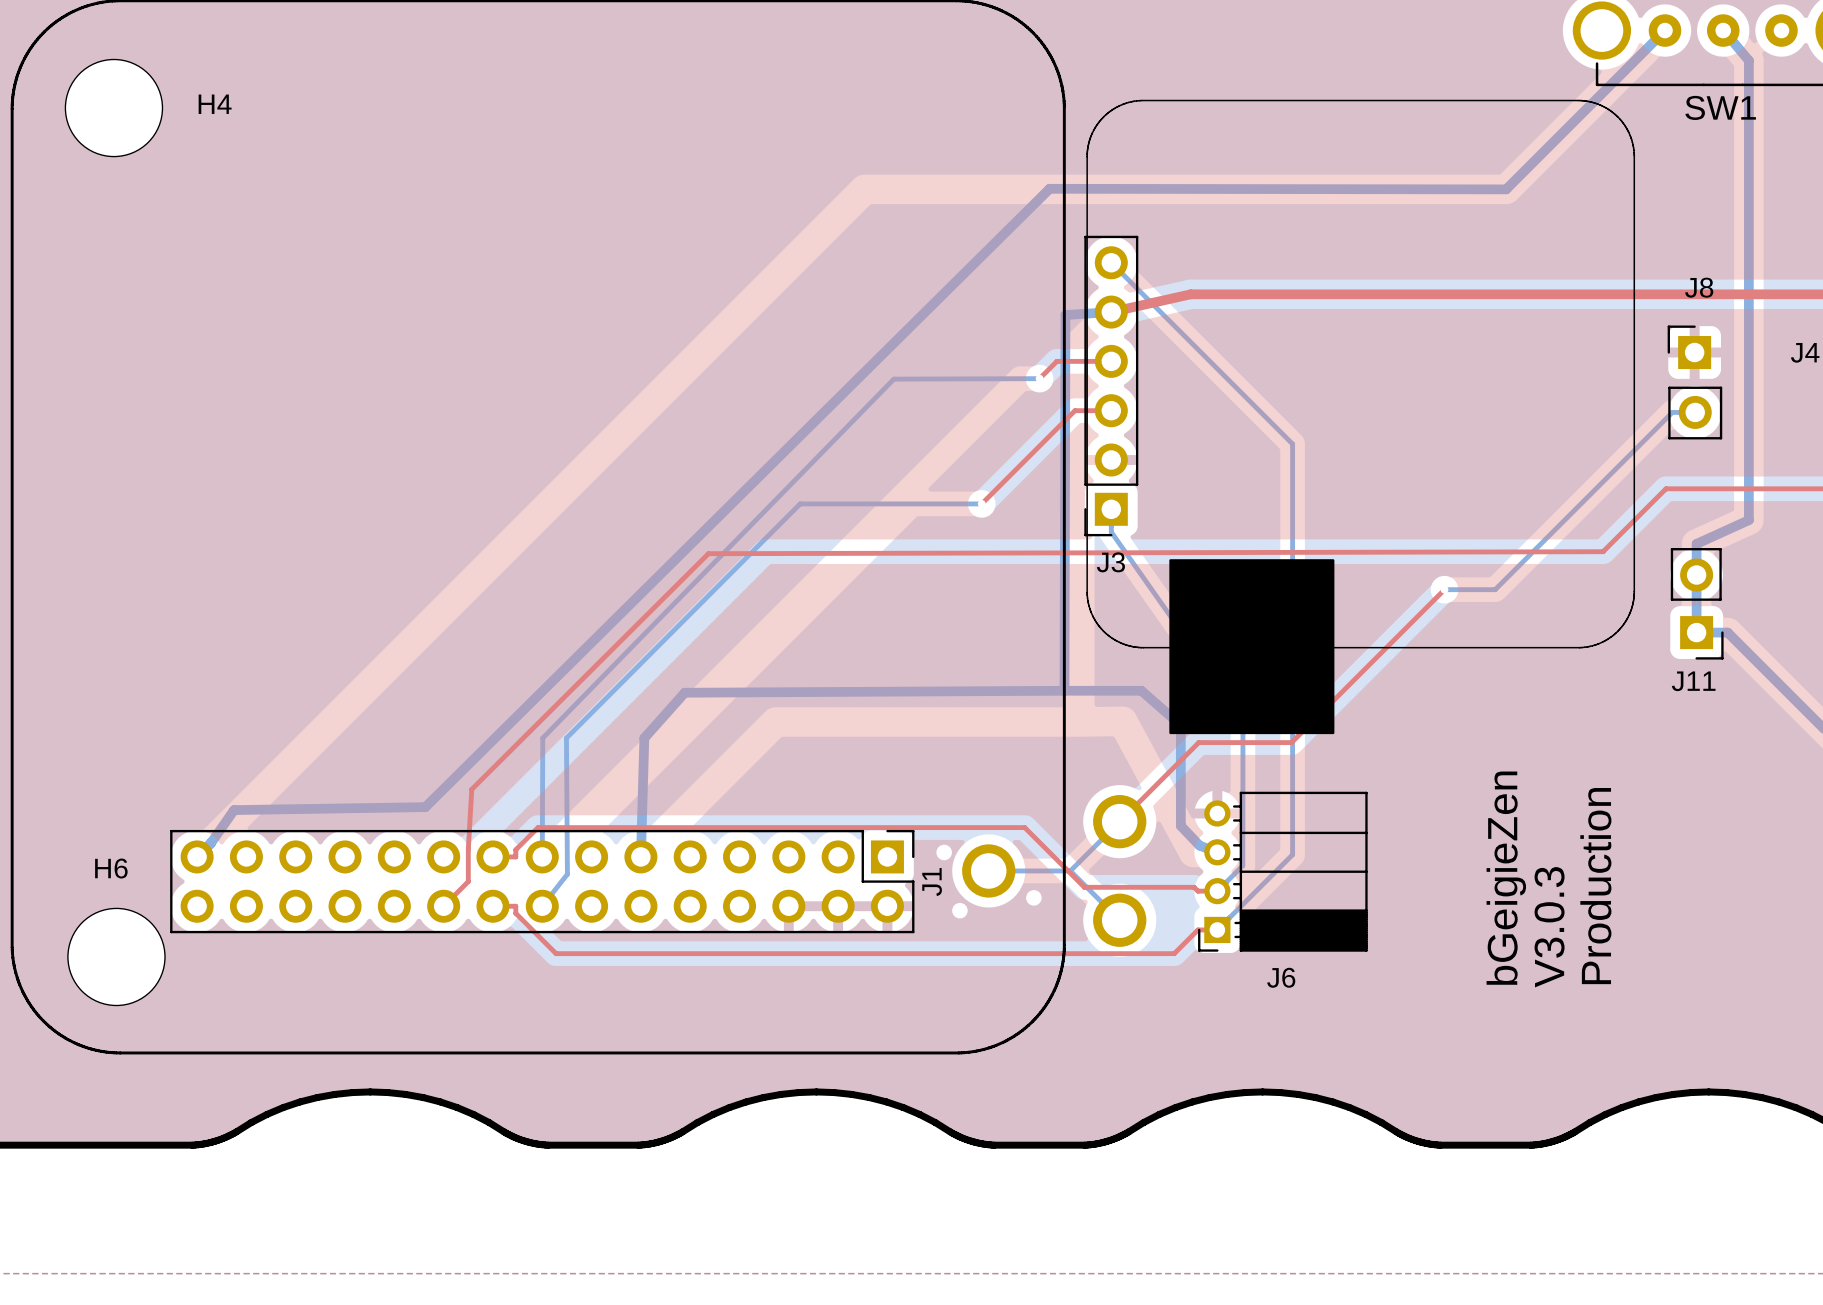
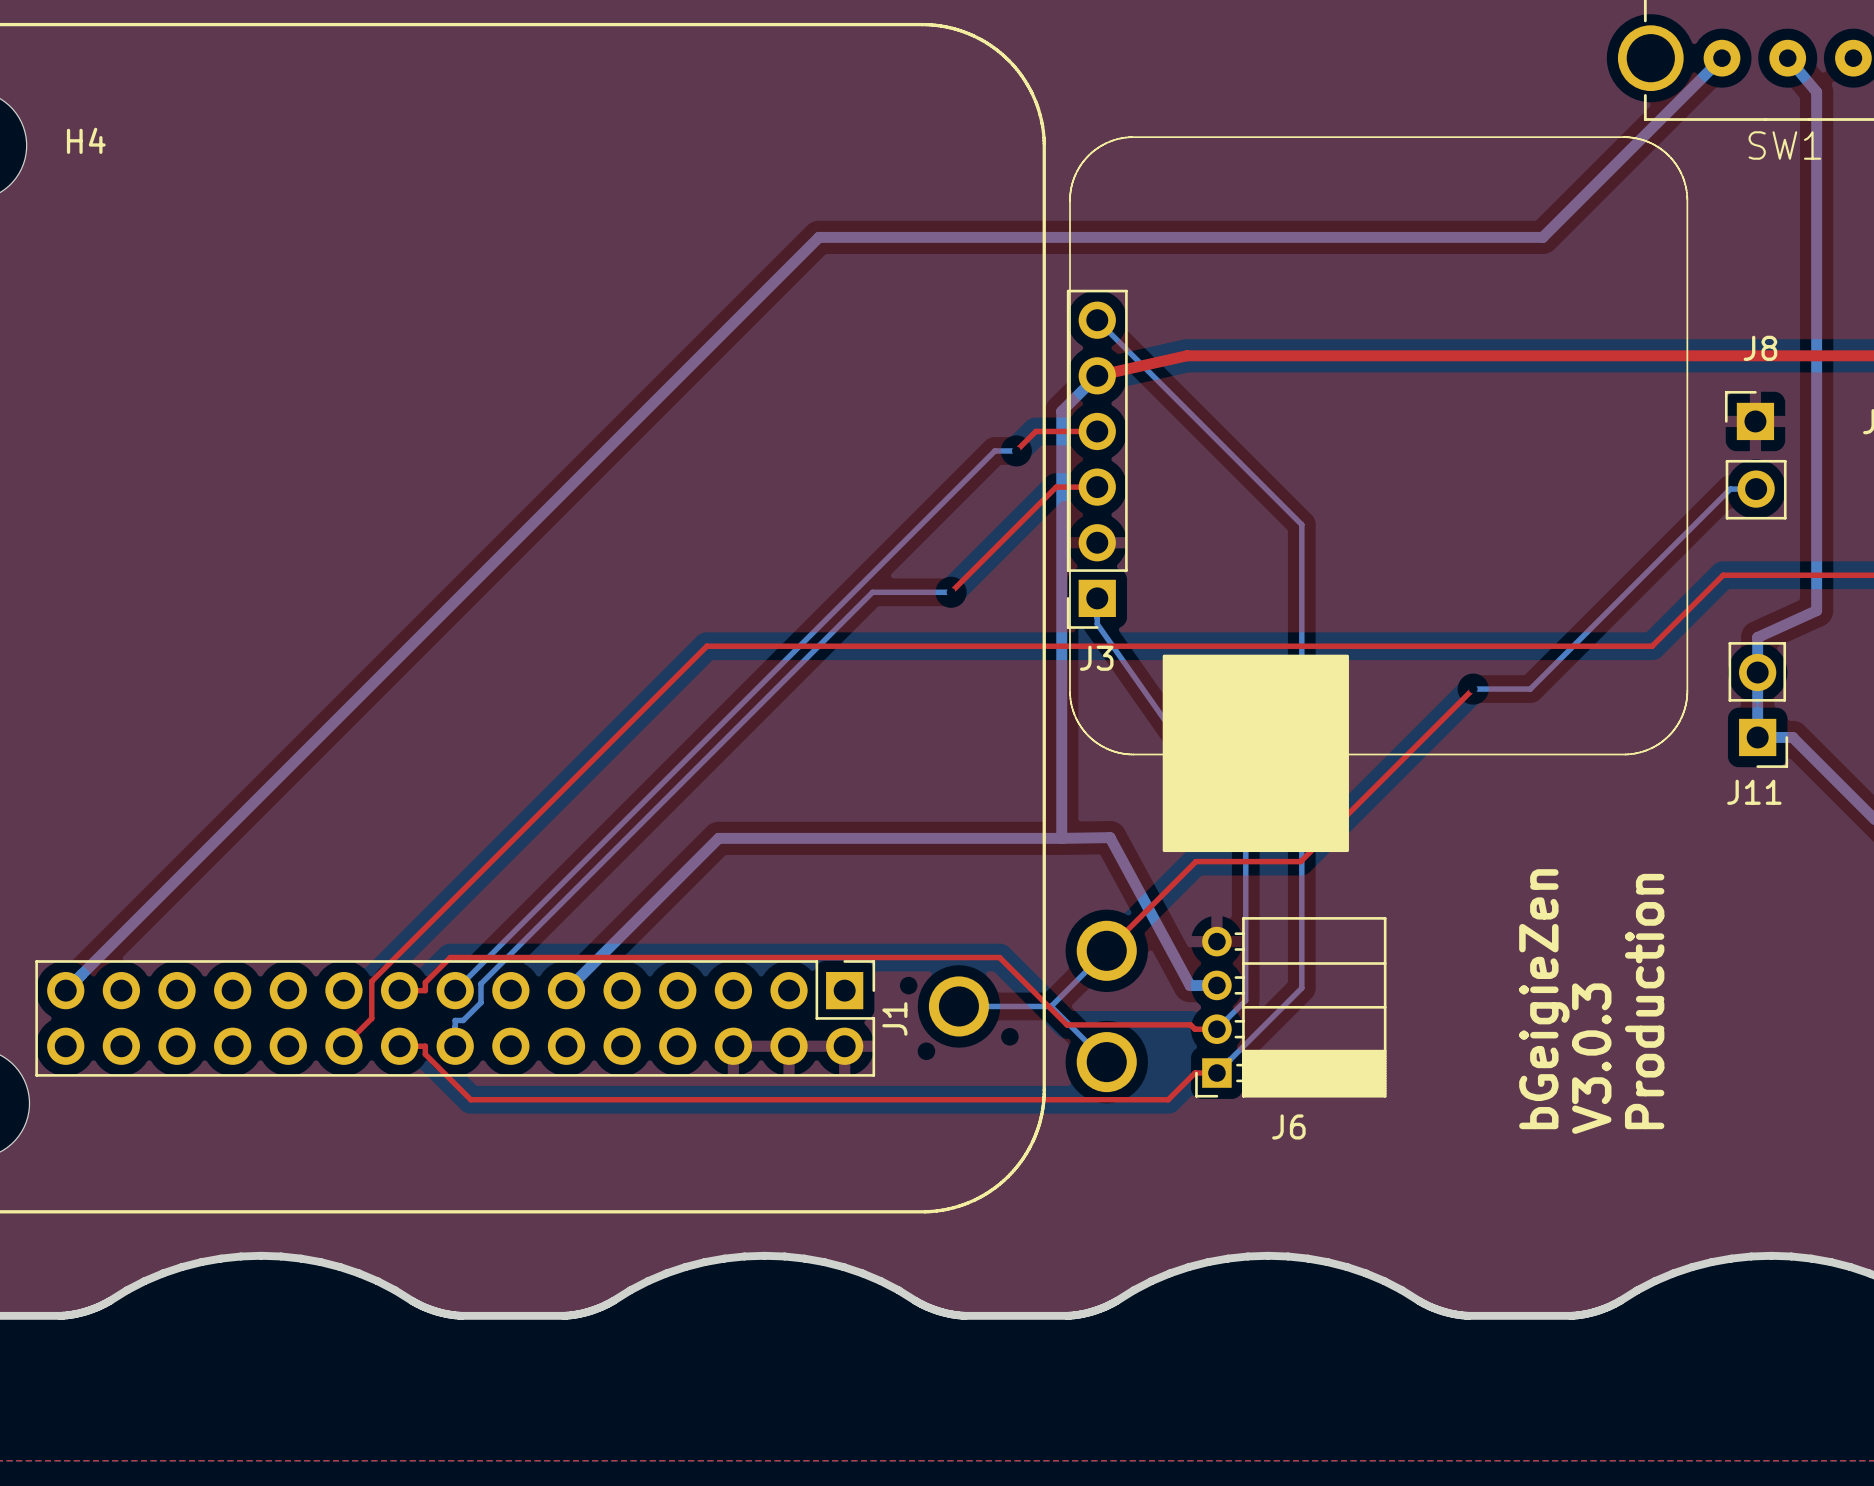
bottom track: (1506, 189) (1049, 188) (425, 807) (234, 810) (211, 842) -> (1542, 237) (818, 237) (81, 974)
bottom track: (1111, 312) (1065, 315) (1064, 690) -> (1097, 375) (1061, 411) (1061, 838)
bottom track: (1039, 378) (893, 379) (542, 738) (542, 856) -> (1016, 450) (994, 450) (455, 990)
bottom track: (912, 503) (800, 503) (566, 738) (567, 874) (542, 906) (542, 900) -> (872, 592) (480, 983) (480, 1002) (463, 1020) (455, 1020) (455, 1039)
top track: (1603, 551) (708, 553) (471, 789) (468, 848) -> (1652, 646) (706, 646) (371, 981)
bottom track: (1064, 690) (1141, 690) (1180, 725) (1180, 825) (1199, 845) (1217, 852) -> (1061, 838) (1110, 837) (1190, 985) (1216, 985)
bottom track: (1064, 690) (684, 692) (644, 738) (640, 856) -> (1061, 838) (718, 838) (566, 990)

